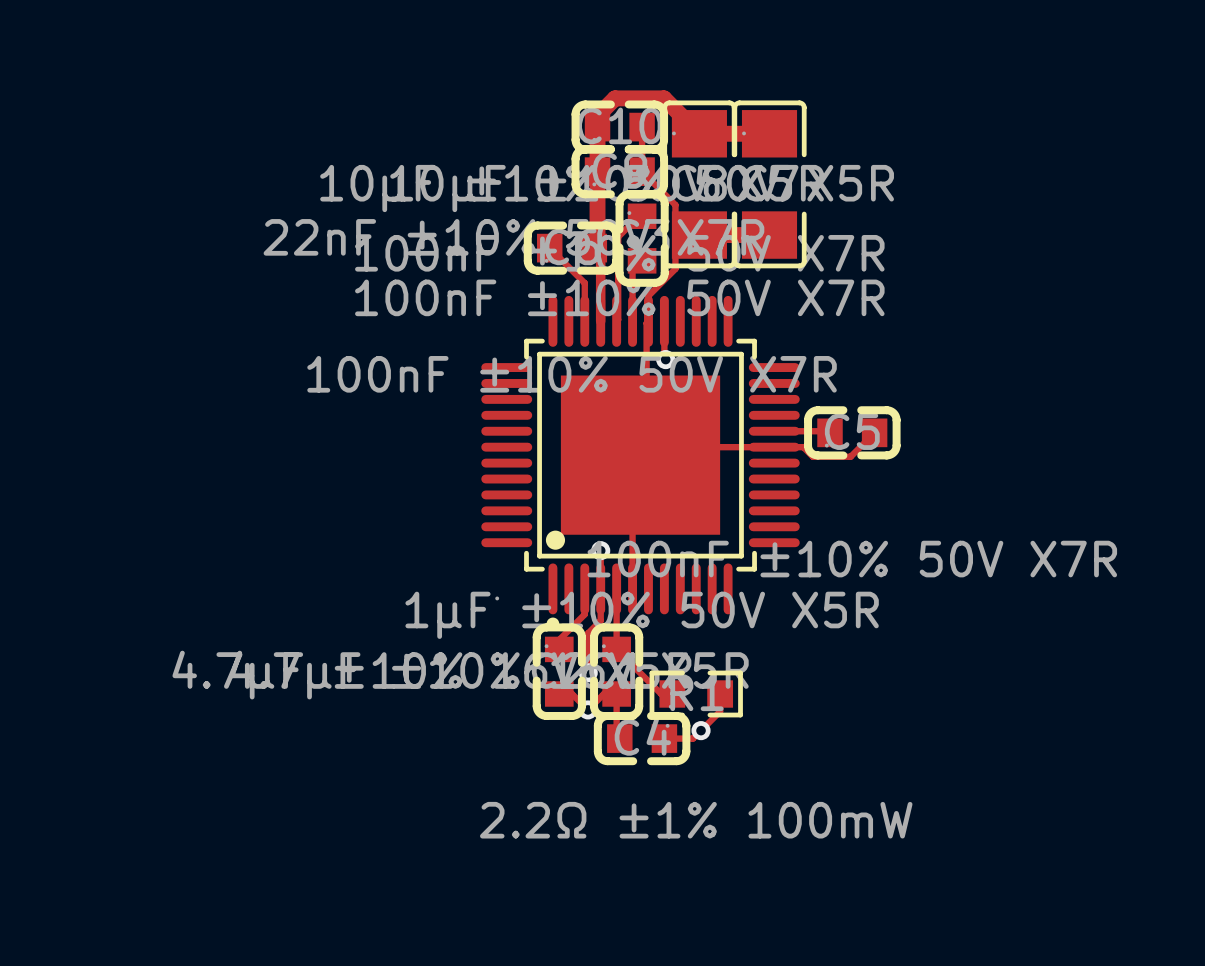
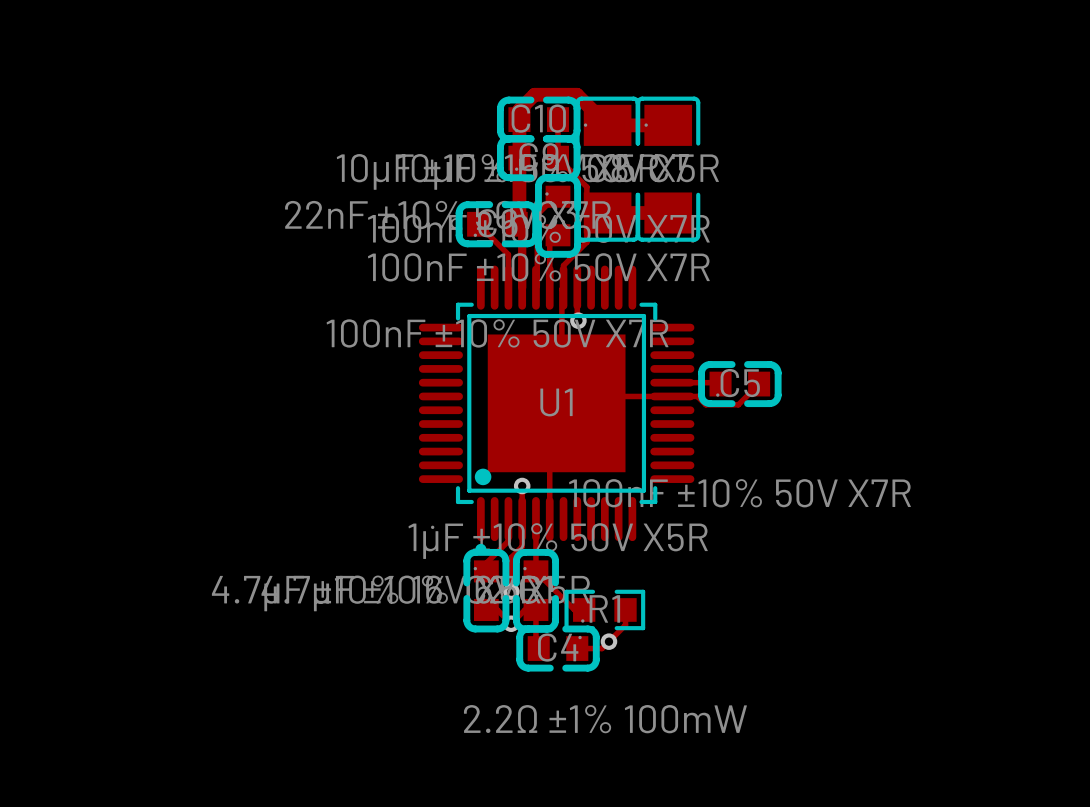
U1 name: none -> U1 (556, 402)

